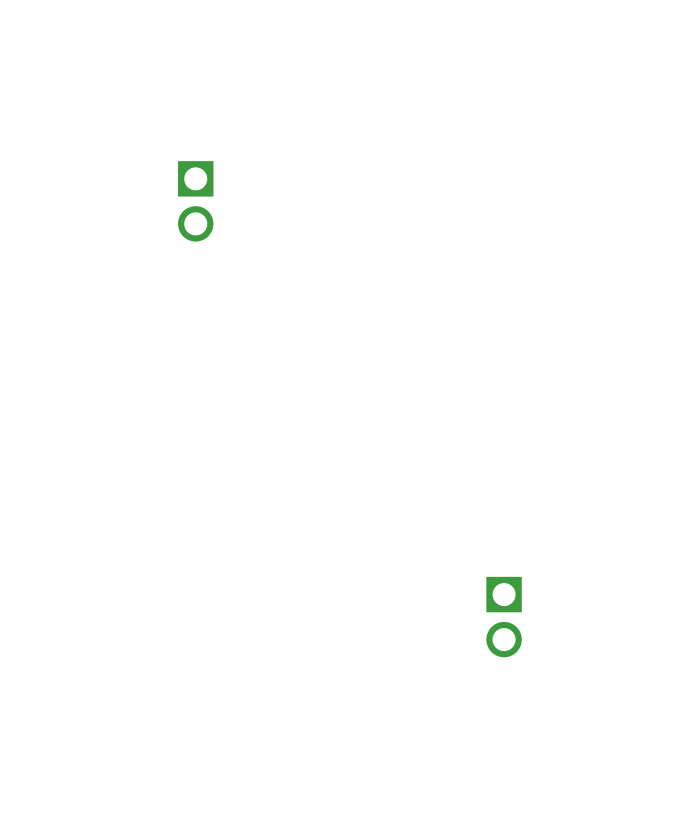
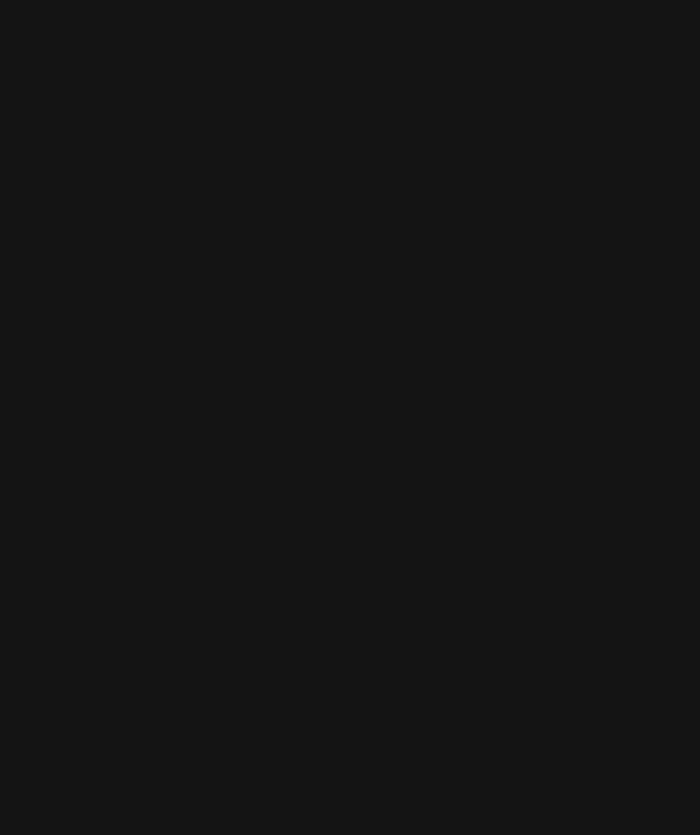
part: (195, 201) -> none
part: (504, 617) -> none

